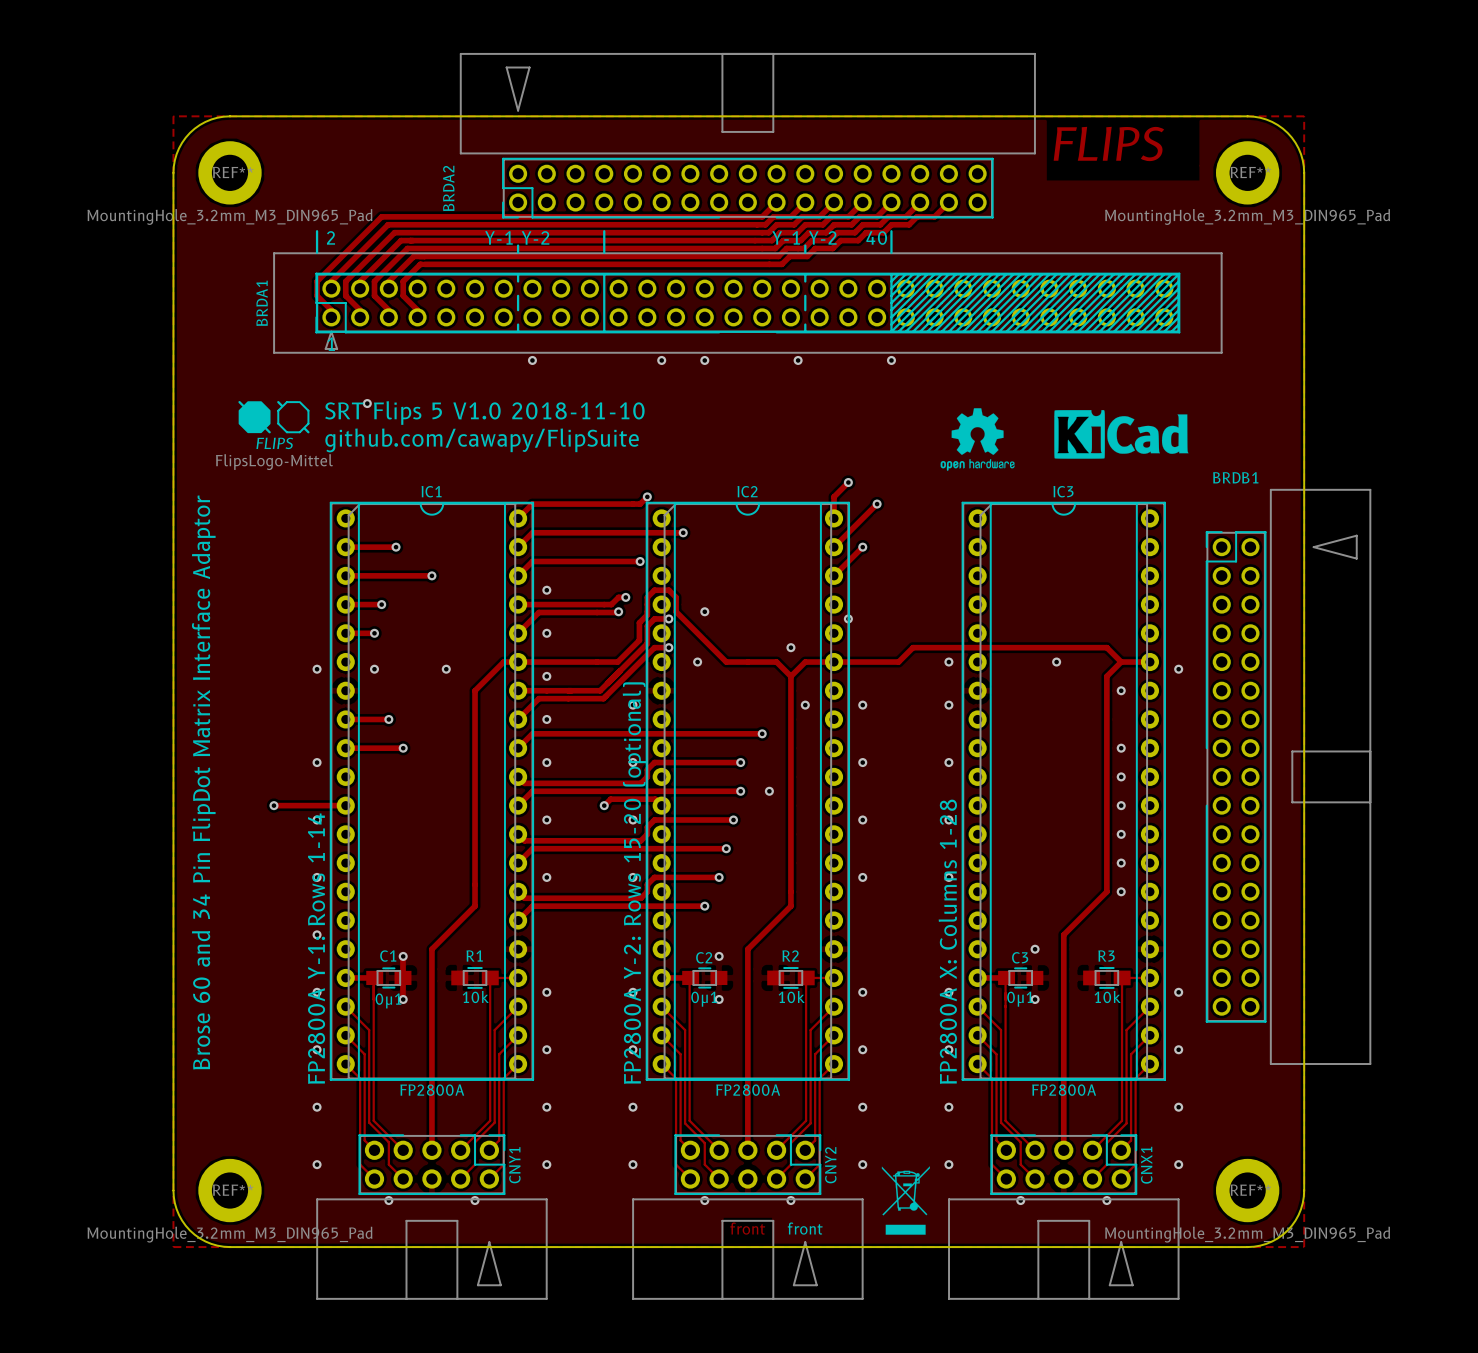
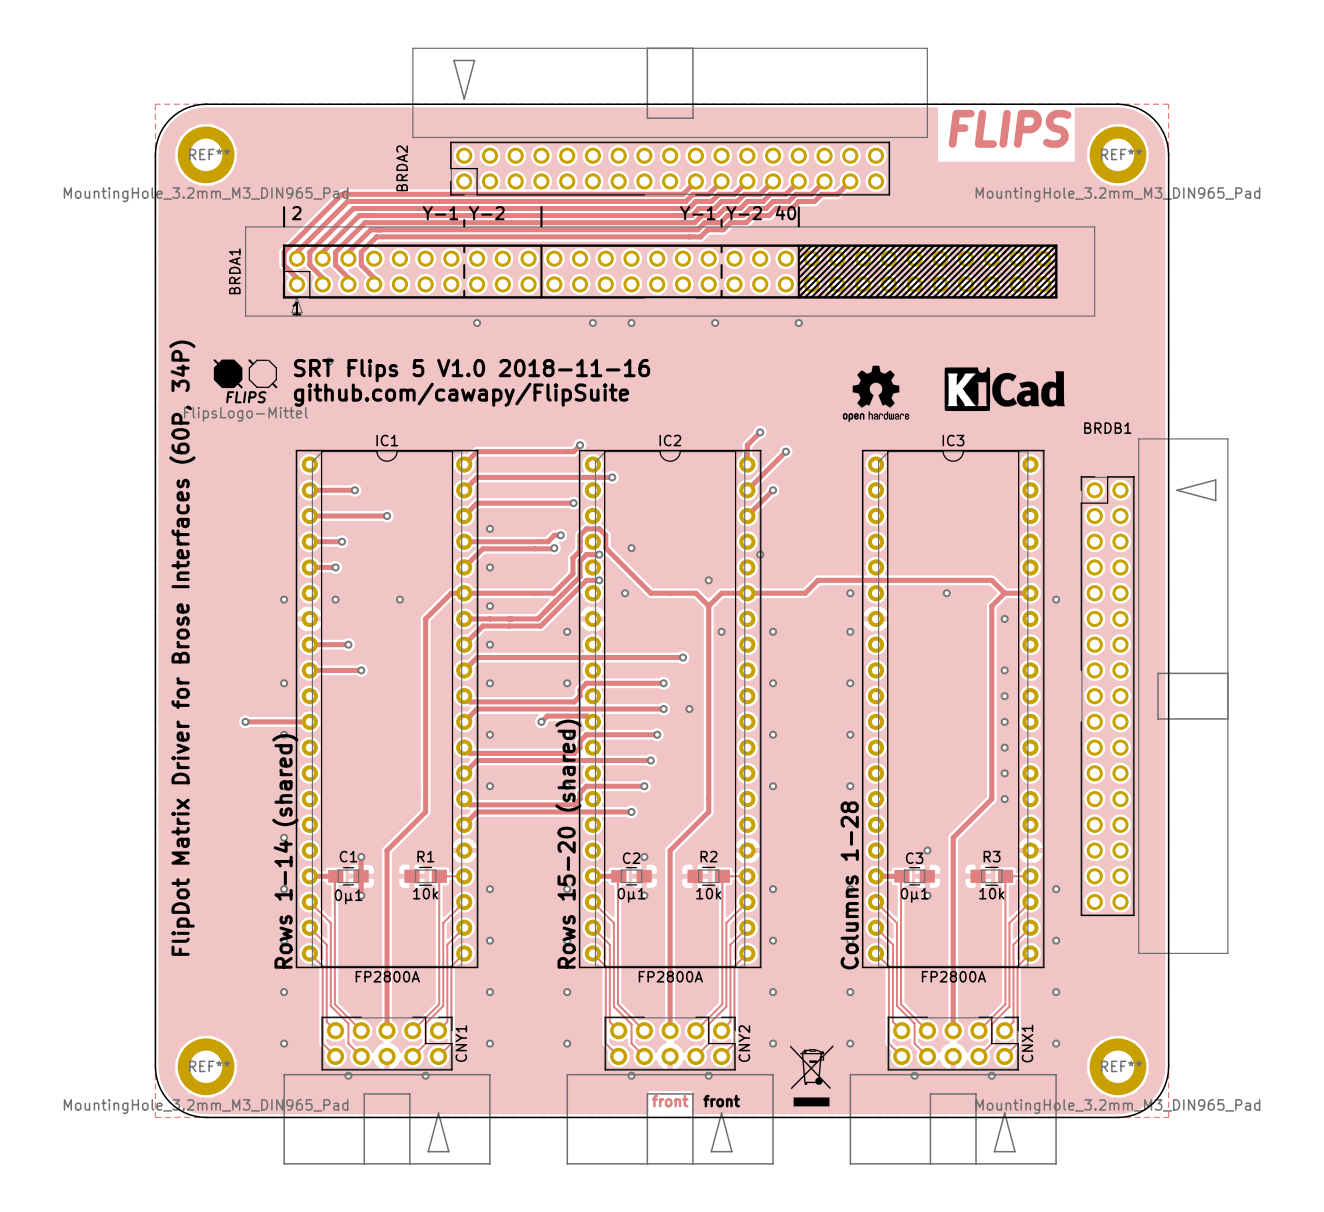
text: SRT Flips 5 V1.0 2018-11-10 (484, 413) -> SRT Flips 5 V1.0 2018-11-16 (472, 370)
text: Brose 60 and 34 Pin FlipDot Matrix Interface Adaptor (203, 782) -> FlipDot Matrix Driver for Brose Interfaces (60P, 34P) (182, 648)
text: FP2800A Y-2: Rows 15-20 (optional) (634, 883) -> Rows 15-20 (shared) (568, 844)
text: FP2800A X: Columns 1-28 (947, 941) -> Columns 1-28 (849, 885)
text: FP2800A Y-1: Rows 1-14 (316, 948) -> Rows 1-14 (shared) (285, 851)

